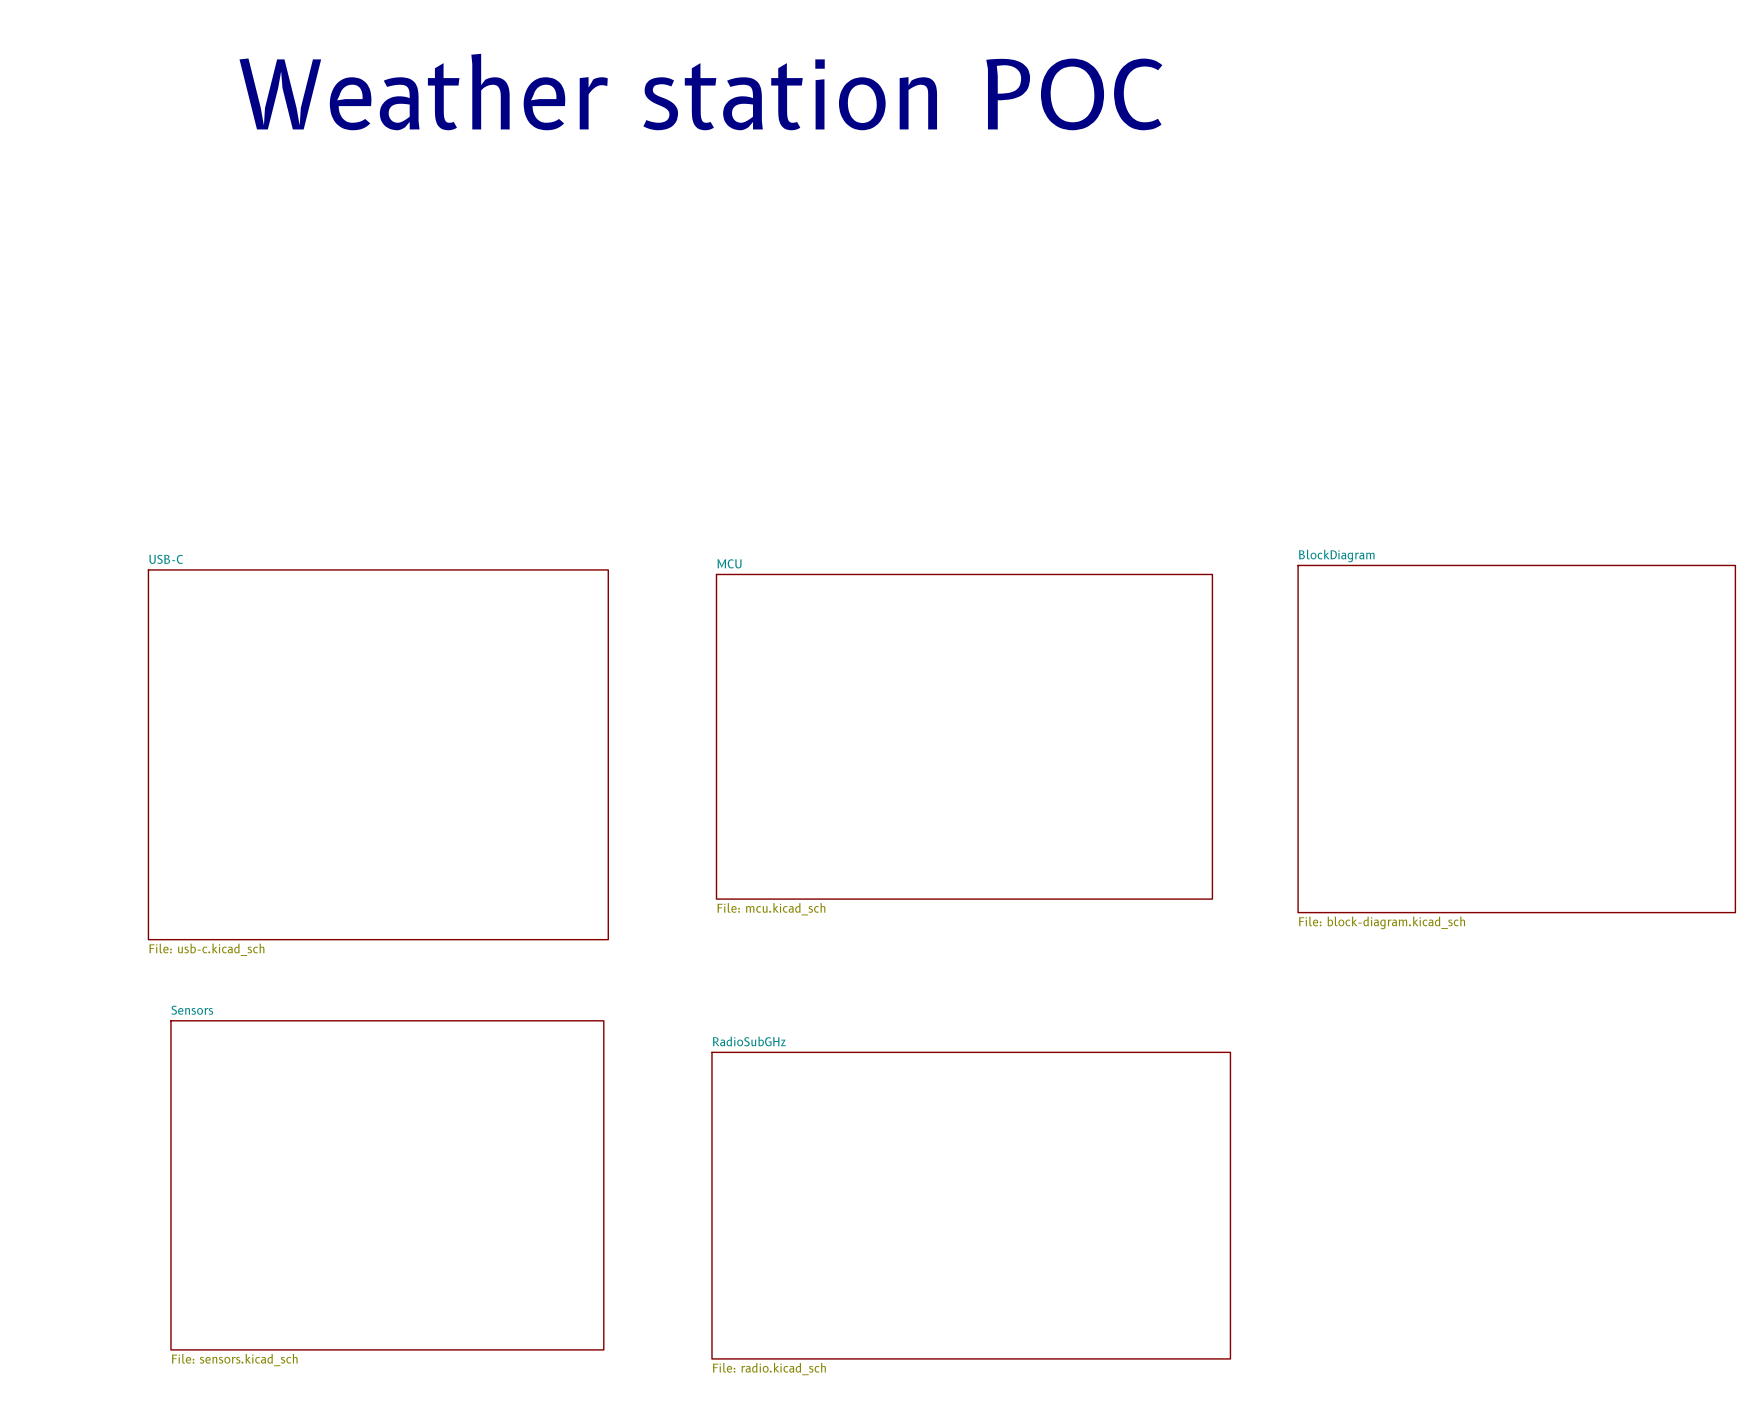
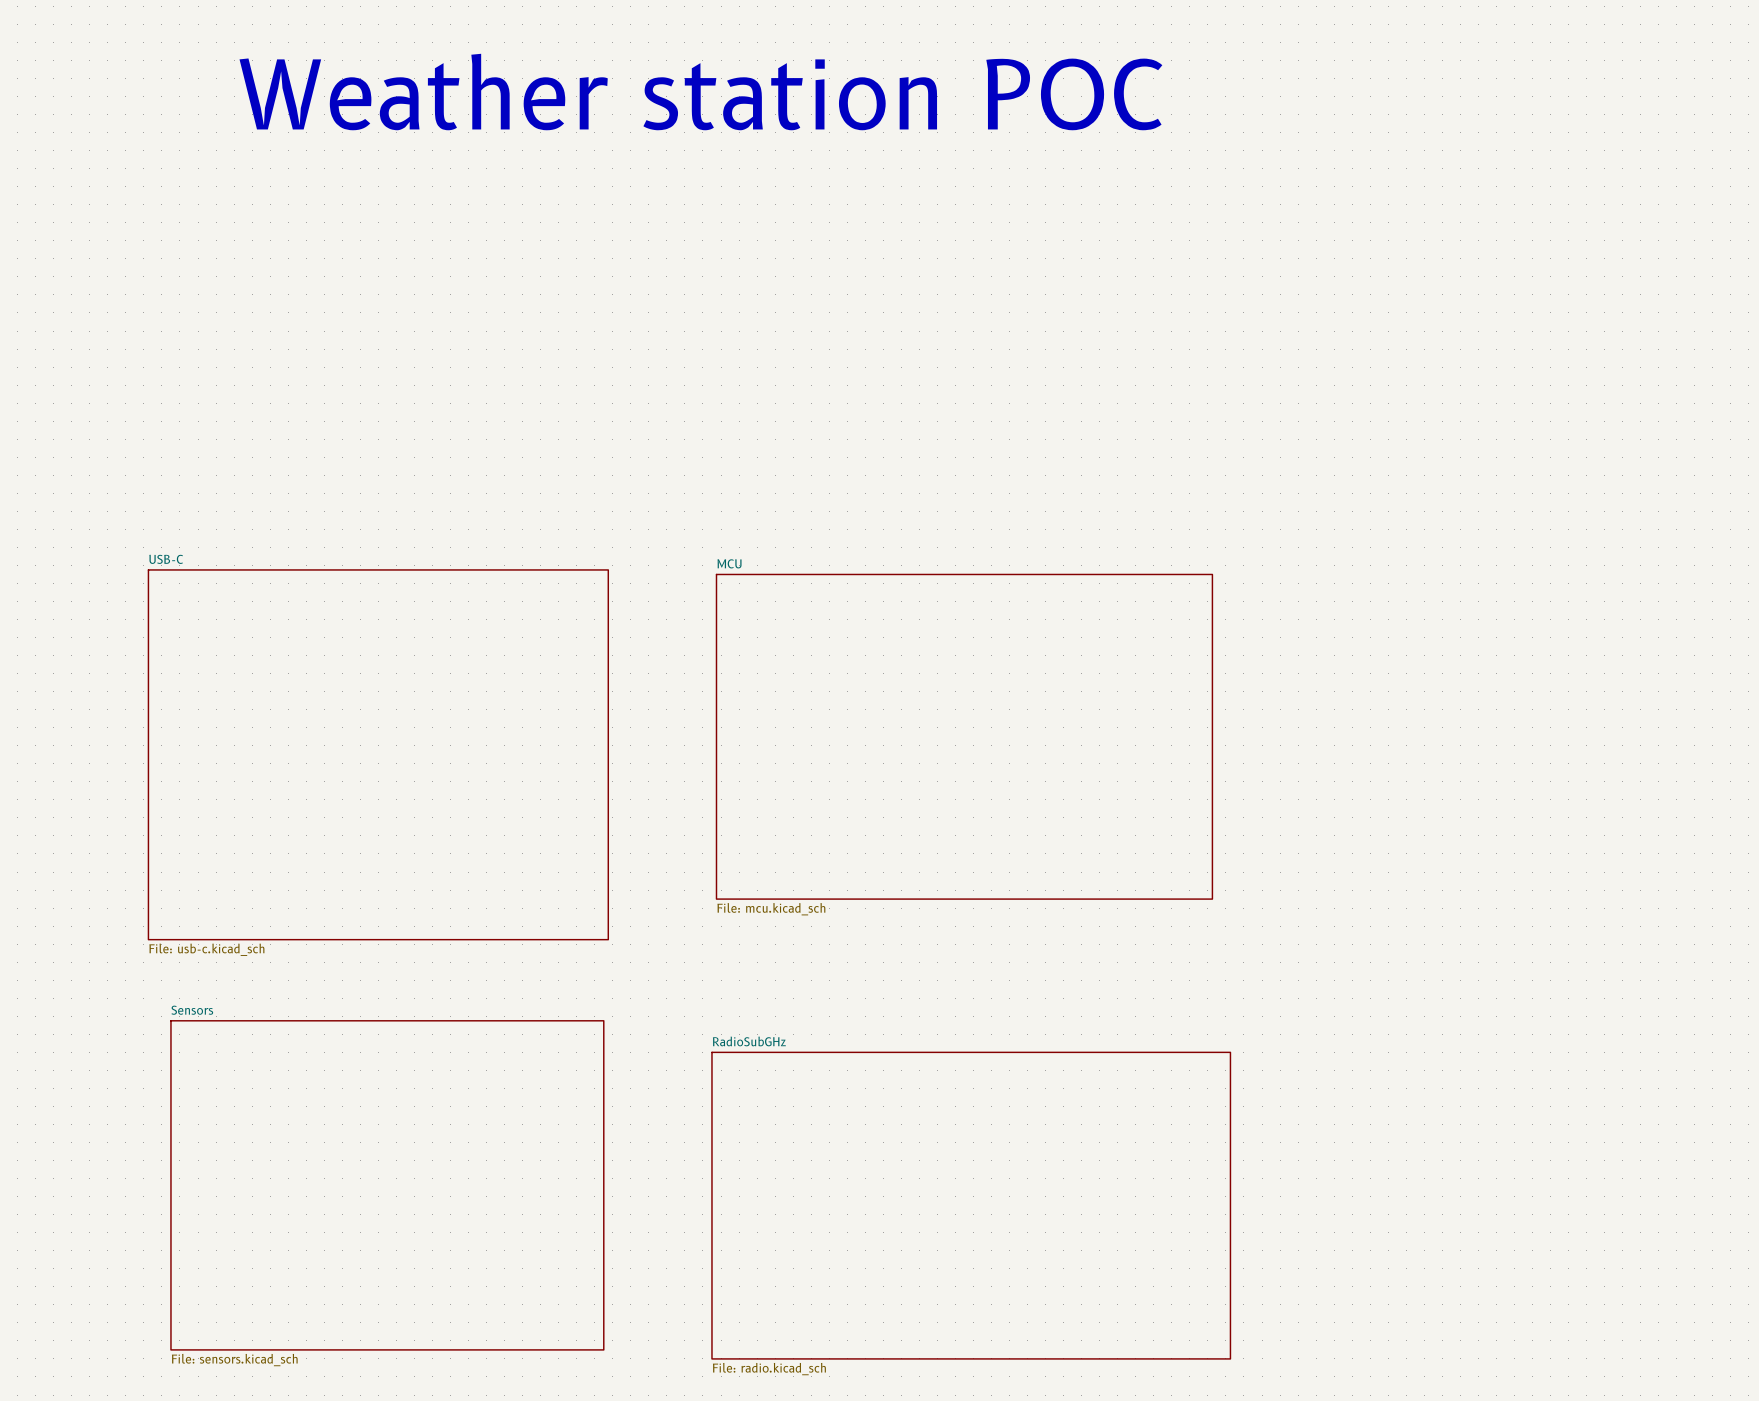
sheet BlockDiagram: File: block-diagram.kicad_sch (1516, 739) -> none

